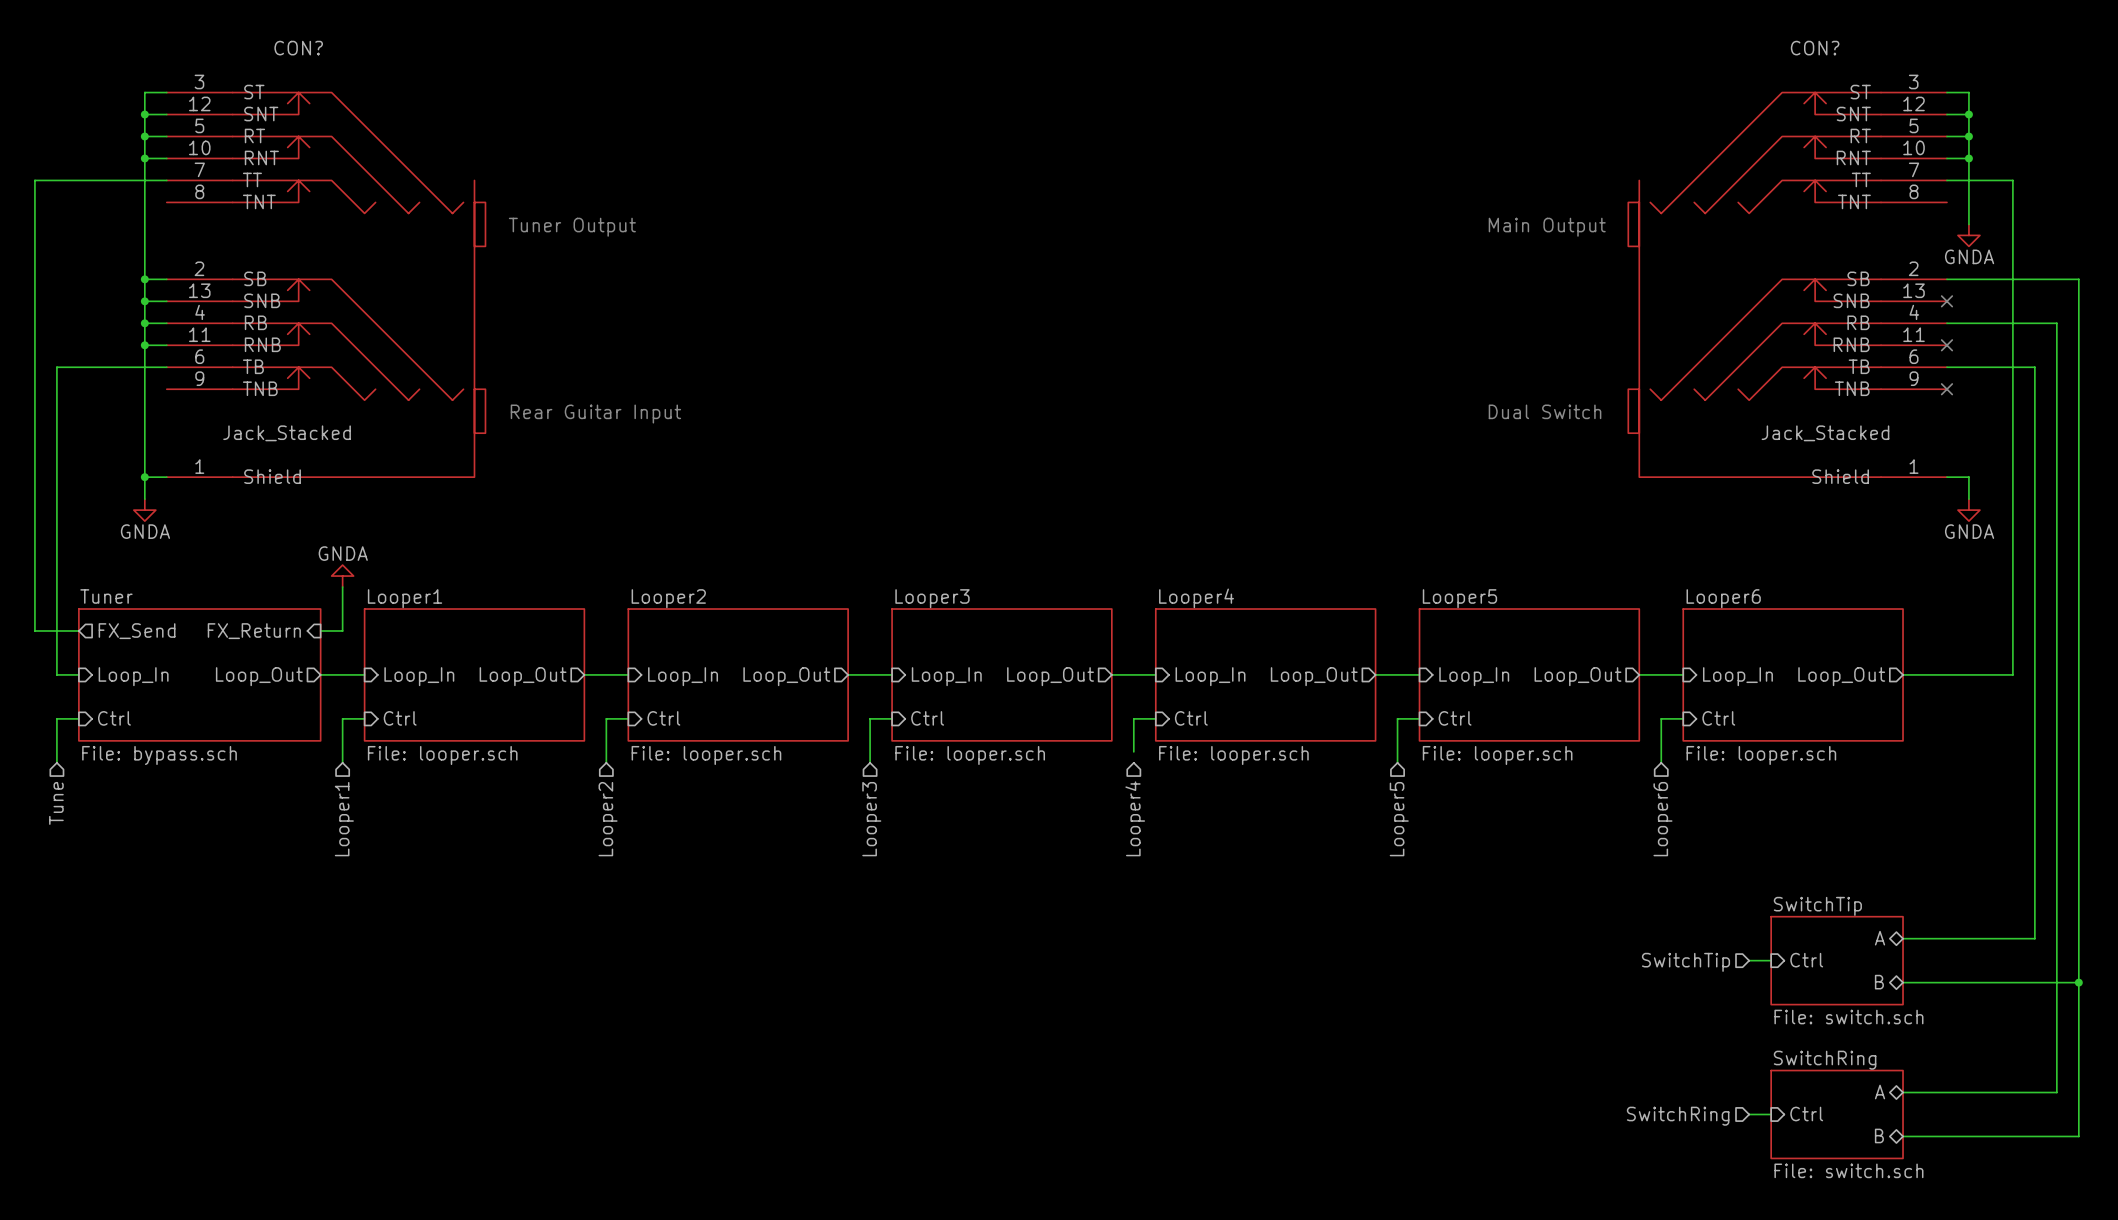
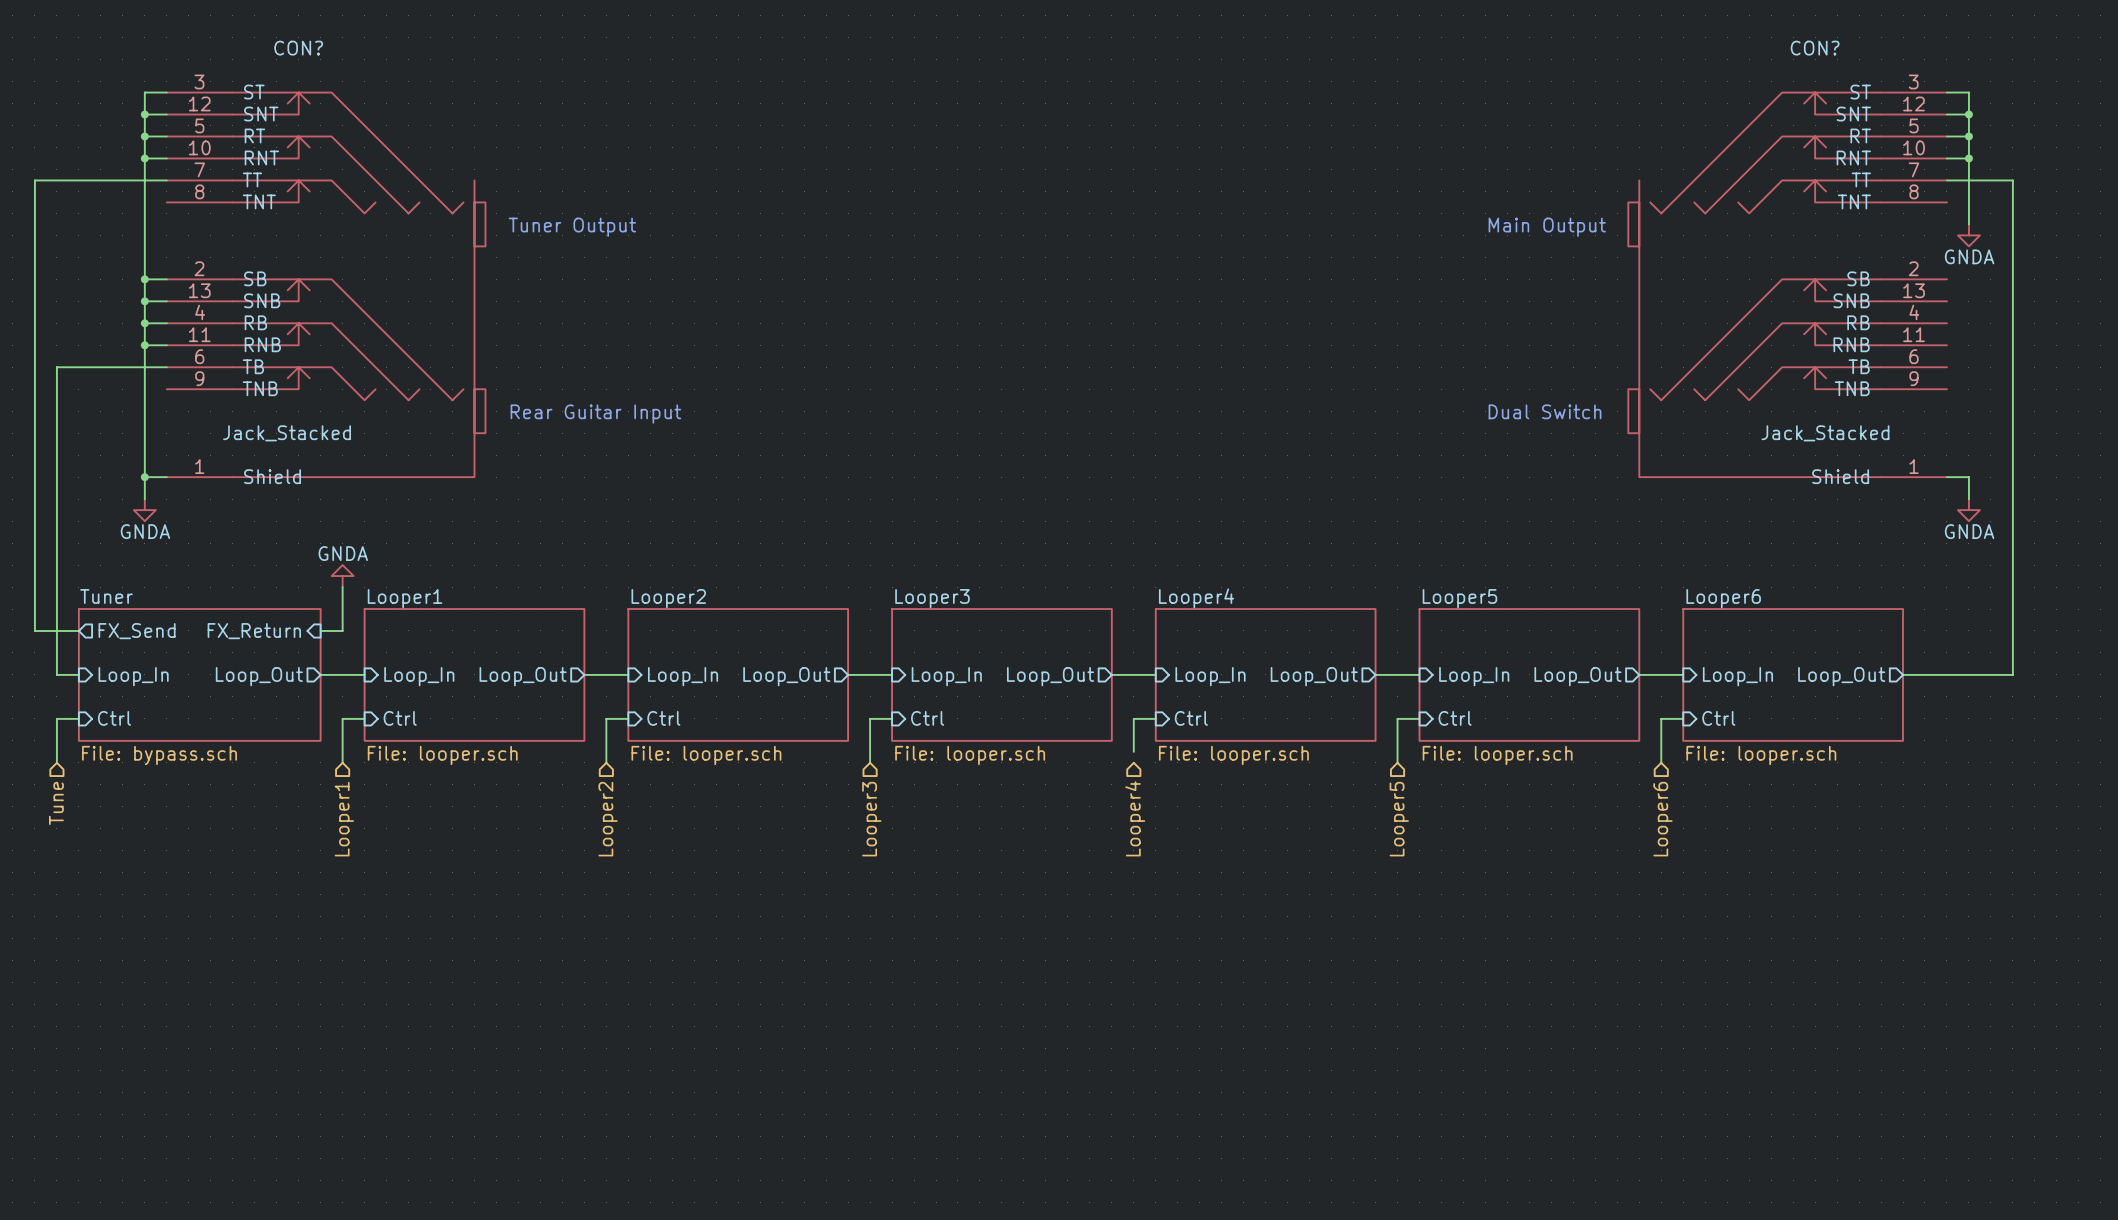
wire: (1946, 279) (2078, 279) (2078, 1136) (1903, 1136) -> none
no-connect mark: (1946, 301) -> none
wire: (1946, 323) (2056, 323) (2056, 1092) (1903, 1092) -> none
no-connect mark: (1946, 345) -> none
wire: (1946, 367) (2034, 367) (2034, 938) (1903, 938) -> none
no-connect mark: (1946, 389) -> none
sheet pin: A (1880, 938) -> none
wire: (1749, 960) (1771, 960) -> none
sheet pin: Ctrl (1806, 960) -> none
sheet SwitchTip: File: switch.sch (1837, 960) -> none
hierarchical label: SwitchTip (1685, 962) -> none
sheet pin: B (1879, 982) -> none
wire: (1903, 982) (2078, 982) -> none
junction: (2078, 982) -> none
sheet pin: A (1880, 1092) -> none
wire: (1749, 1114) (1771, 1114) -> none
sheet pin: Ctrl (1806, 1114) -> none
sheet SwitchRing: File: switch.sch (1837, 1114) -> none
hierarchical label: SwitchRing (1678, 1116) -> none
sheet pin: B (1879, 1135) -> none

